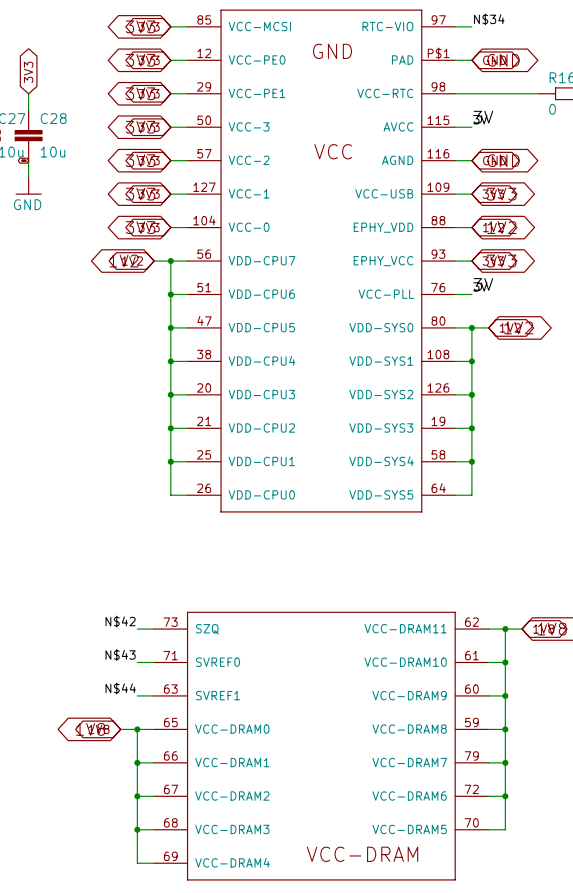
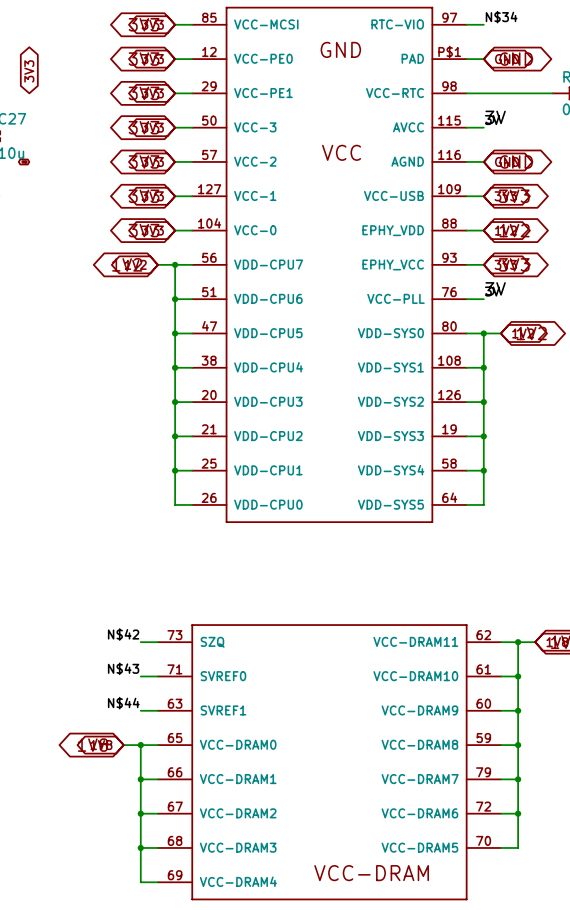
wire: (28, 93) (28, 110) -> none
C28: 10u (28, 135) -> none
wire: (28, 160) (28, 177) -> none
power symbol: GND (28, 185) -> none

